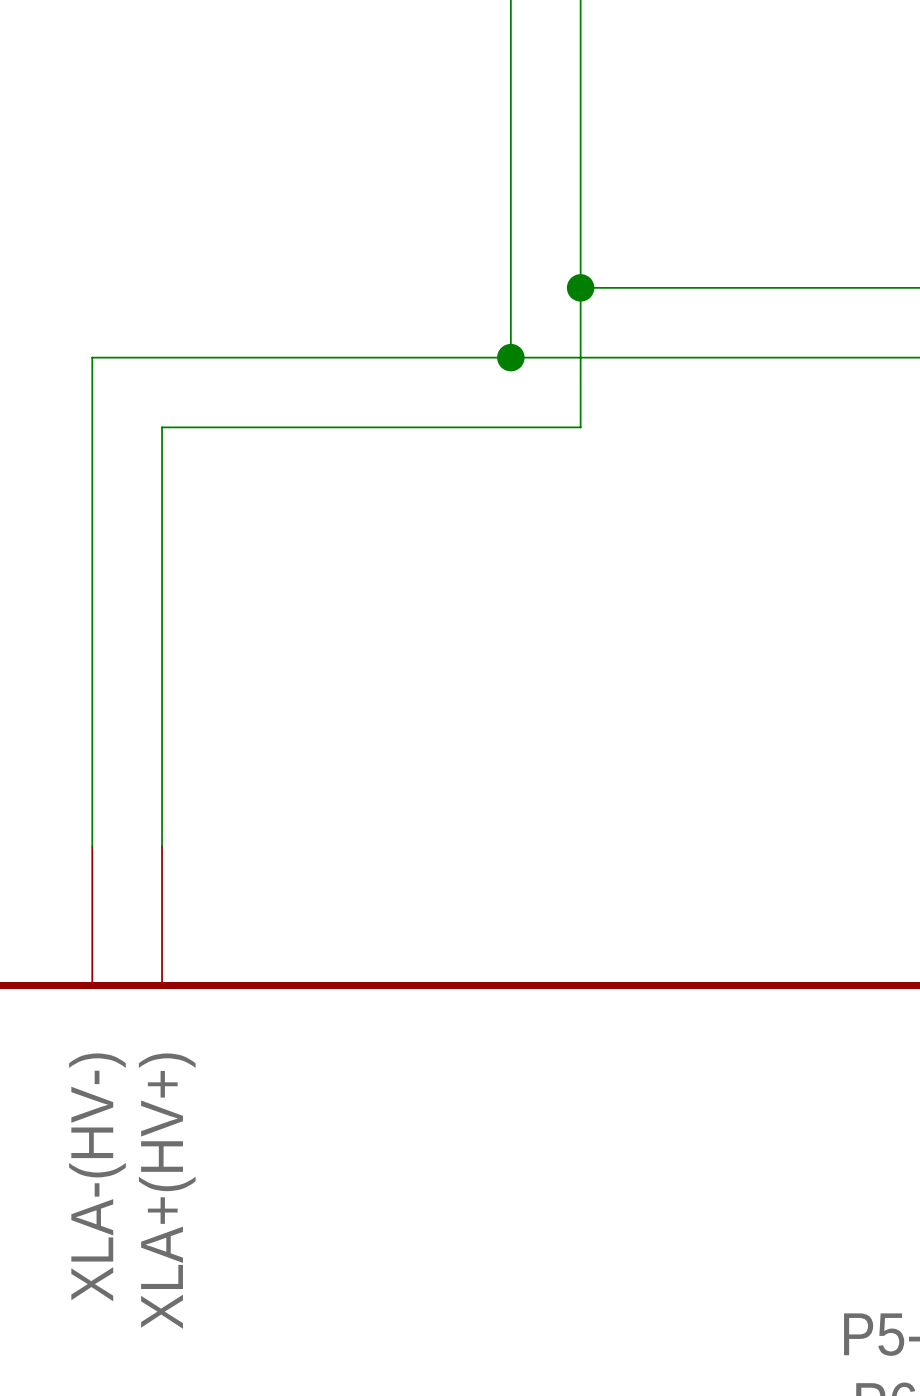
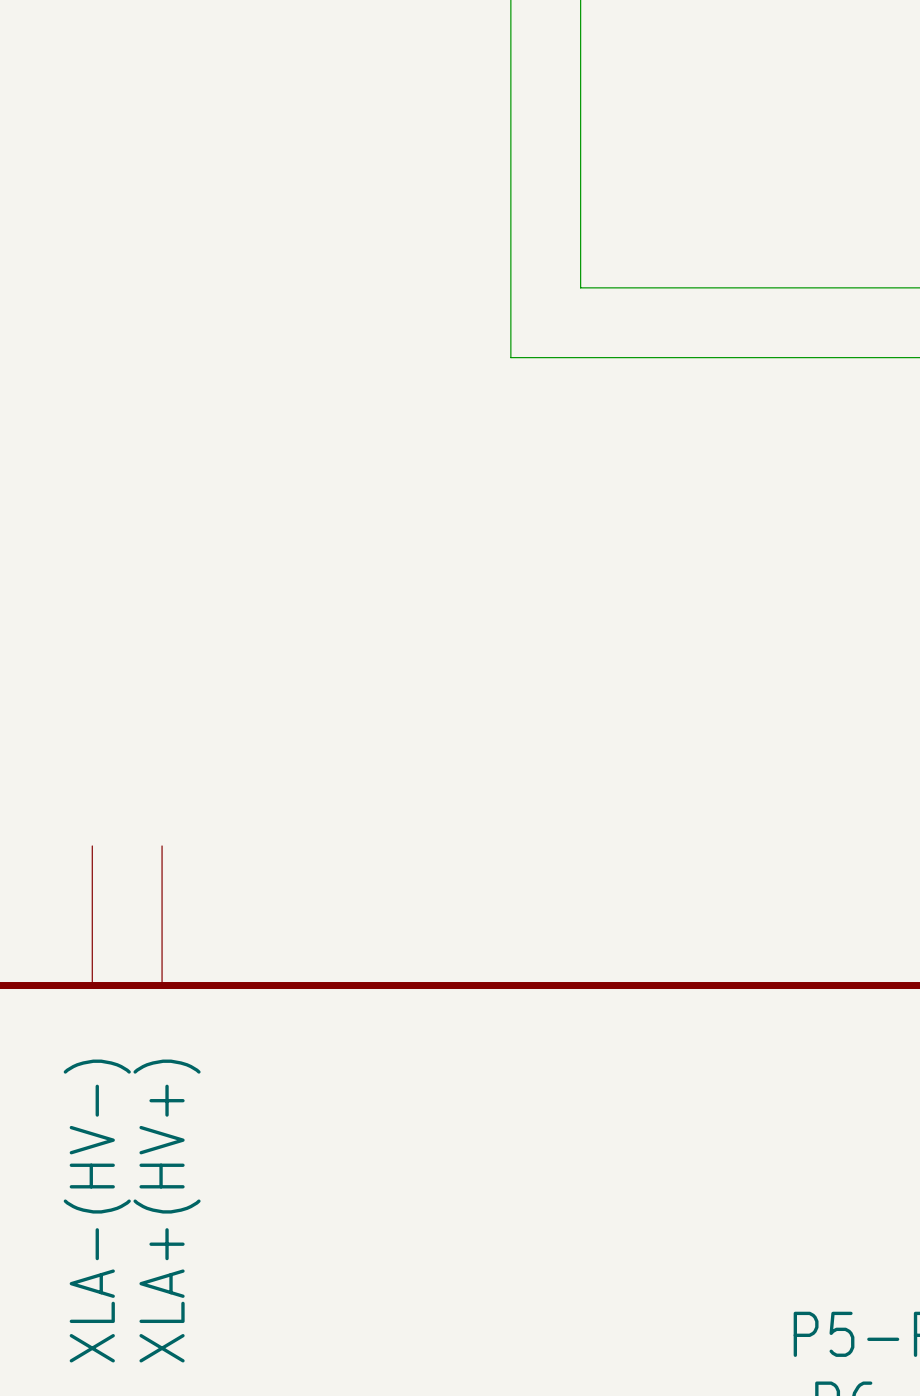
wire: (580, 287) (580, 427) (162, 427) (162, 845) -> none
junction: (580, 287) -> none
wire: (510, 357) (92, 357) (92, 845) -> none
junction: (510, 357) -> none

